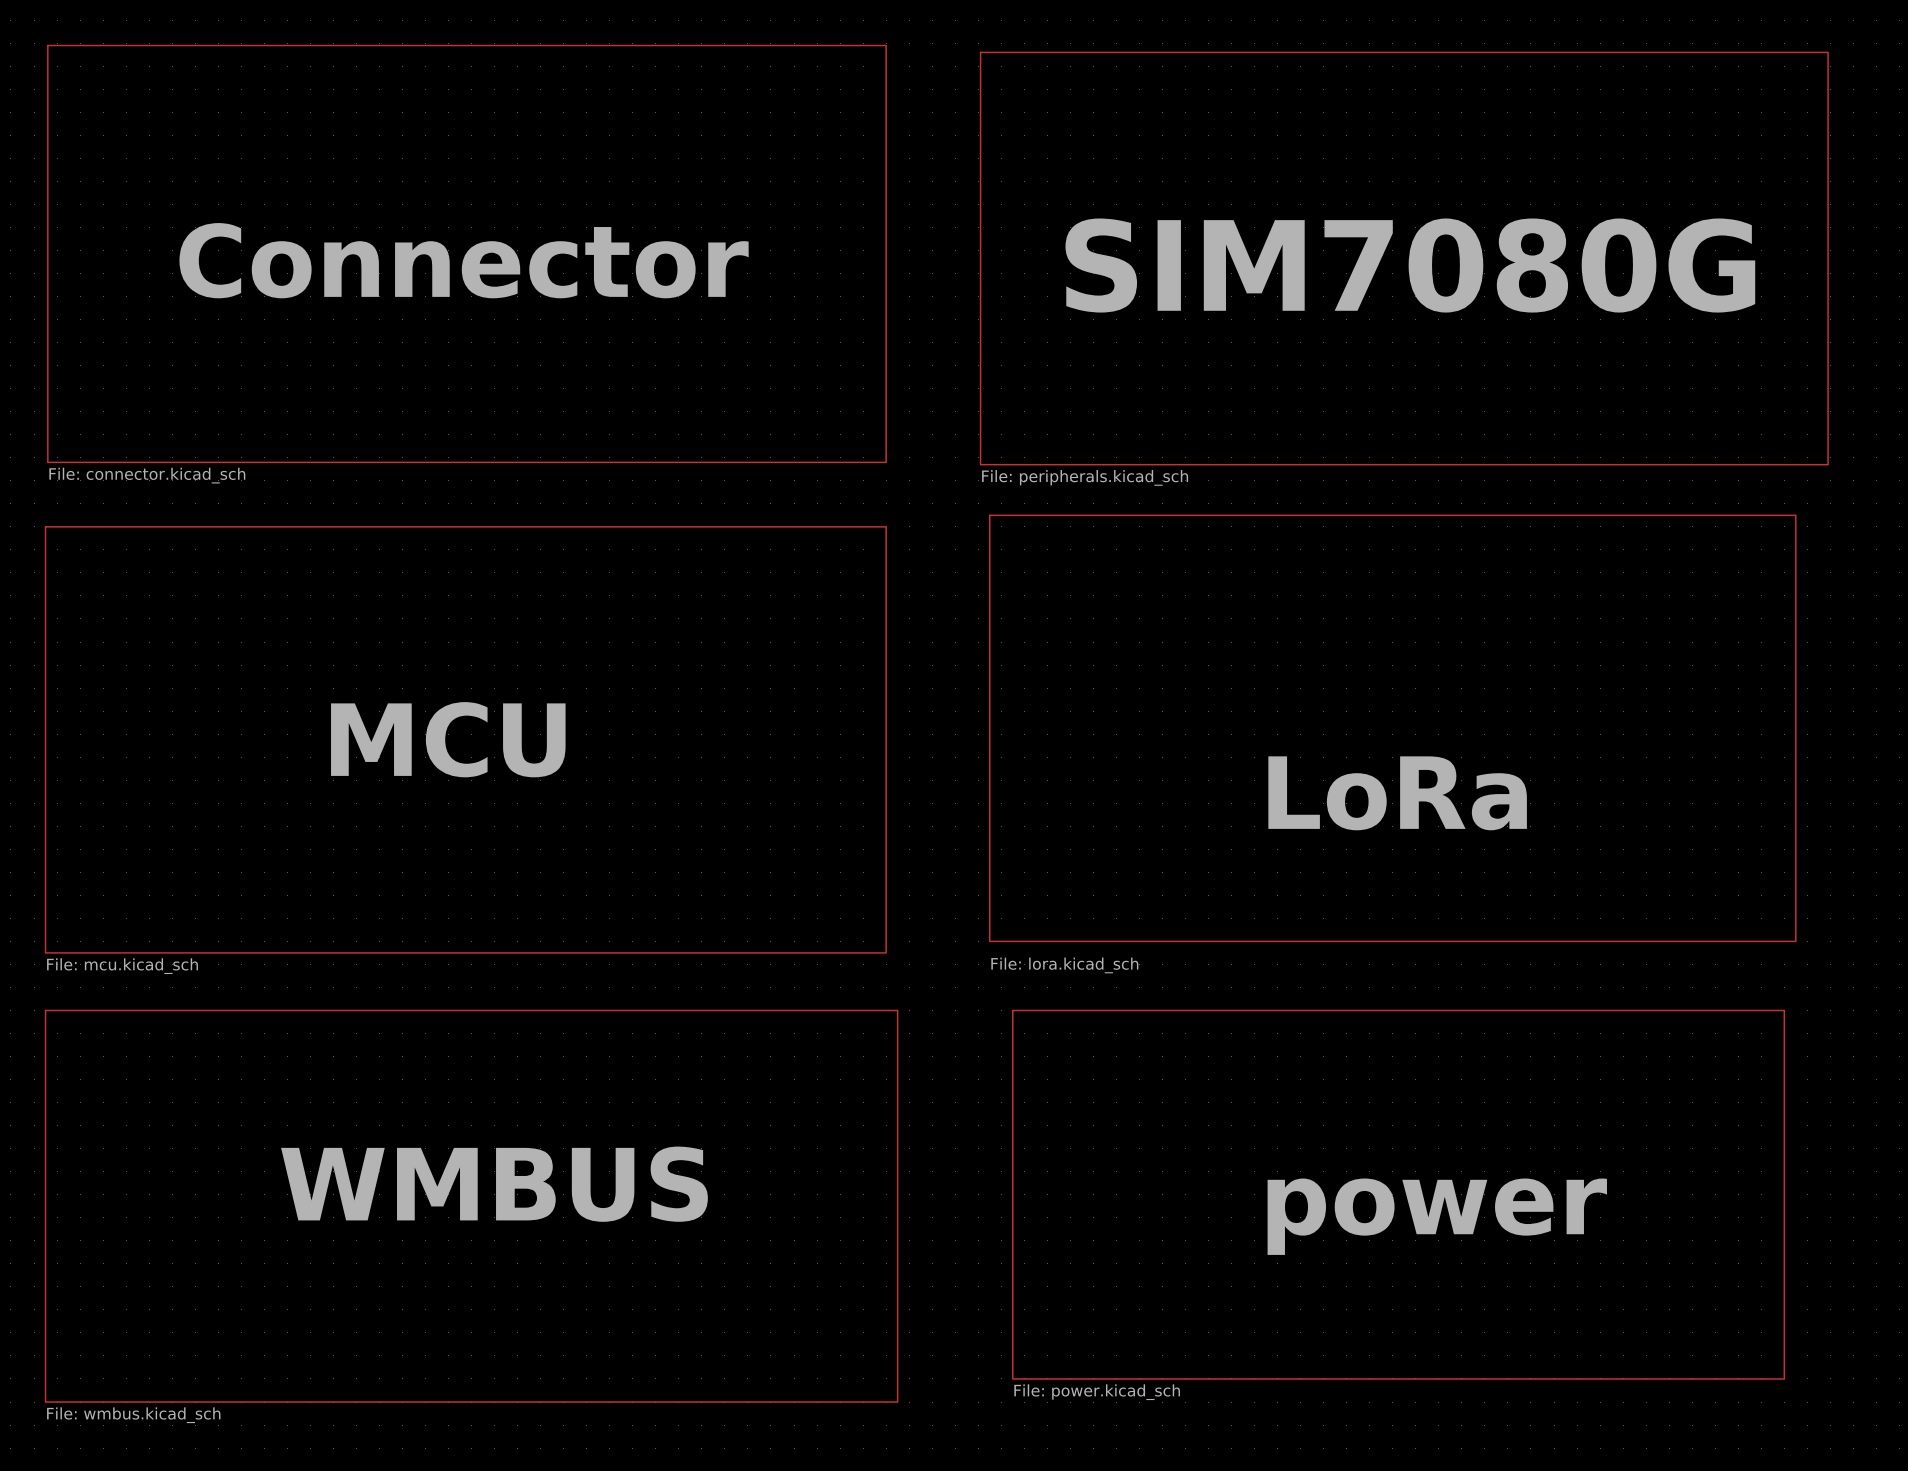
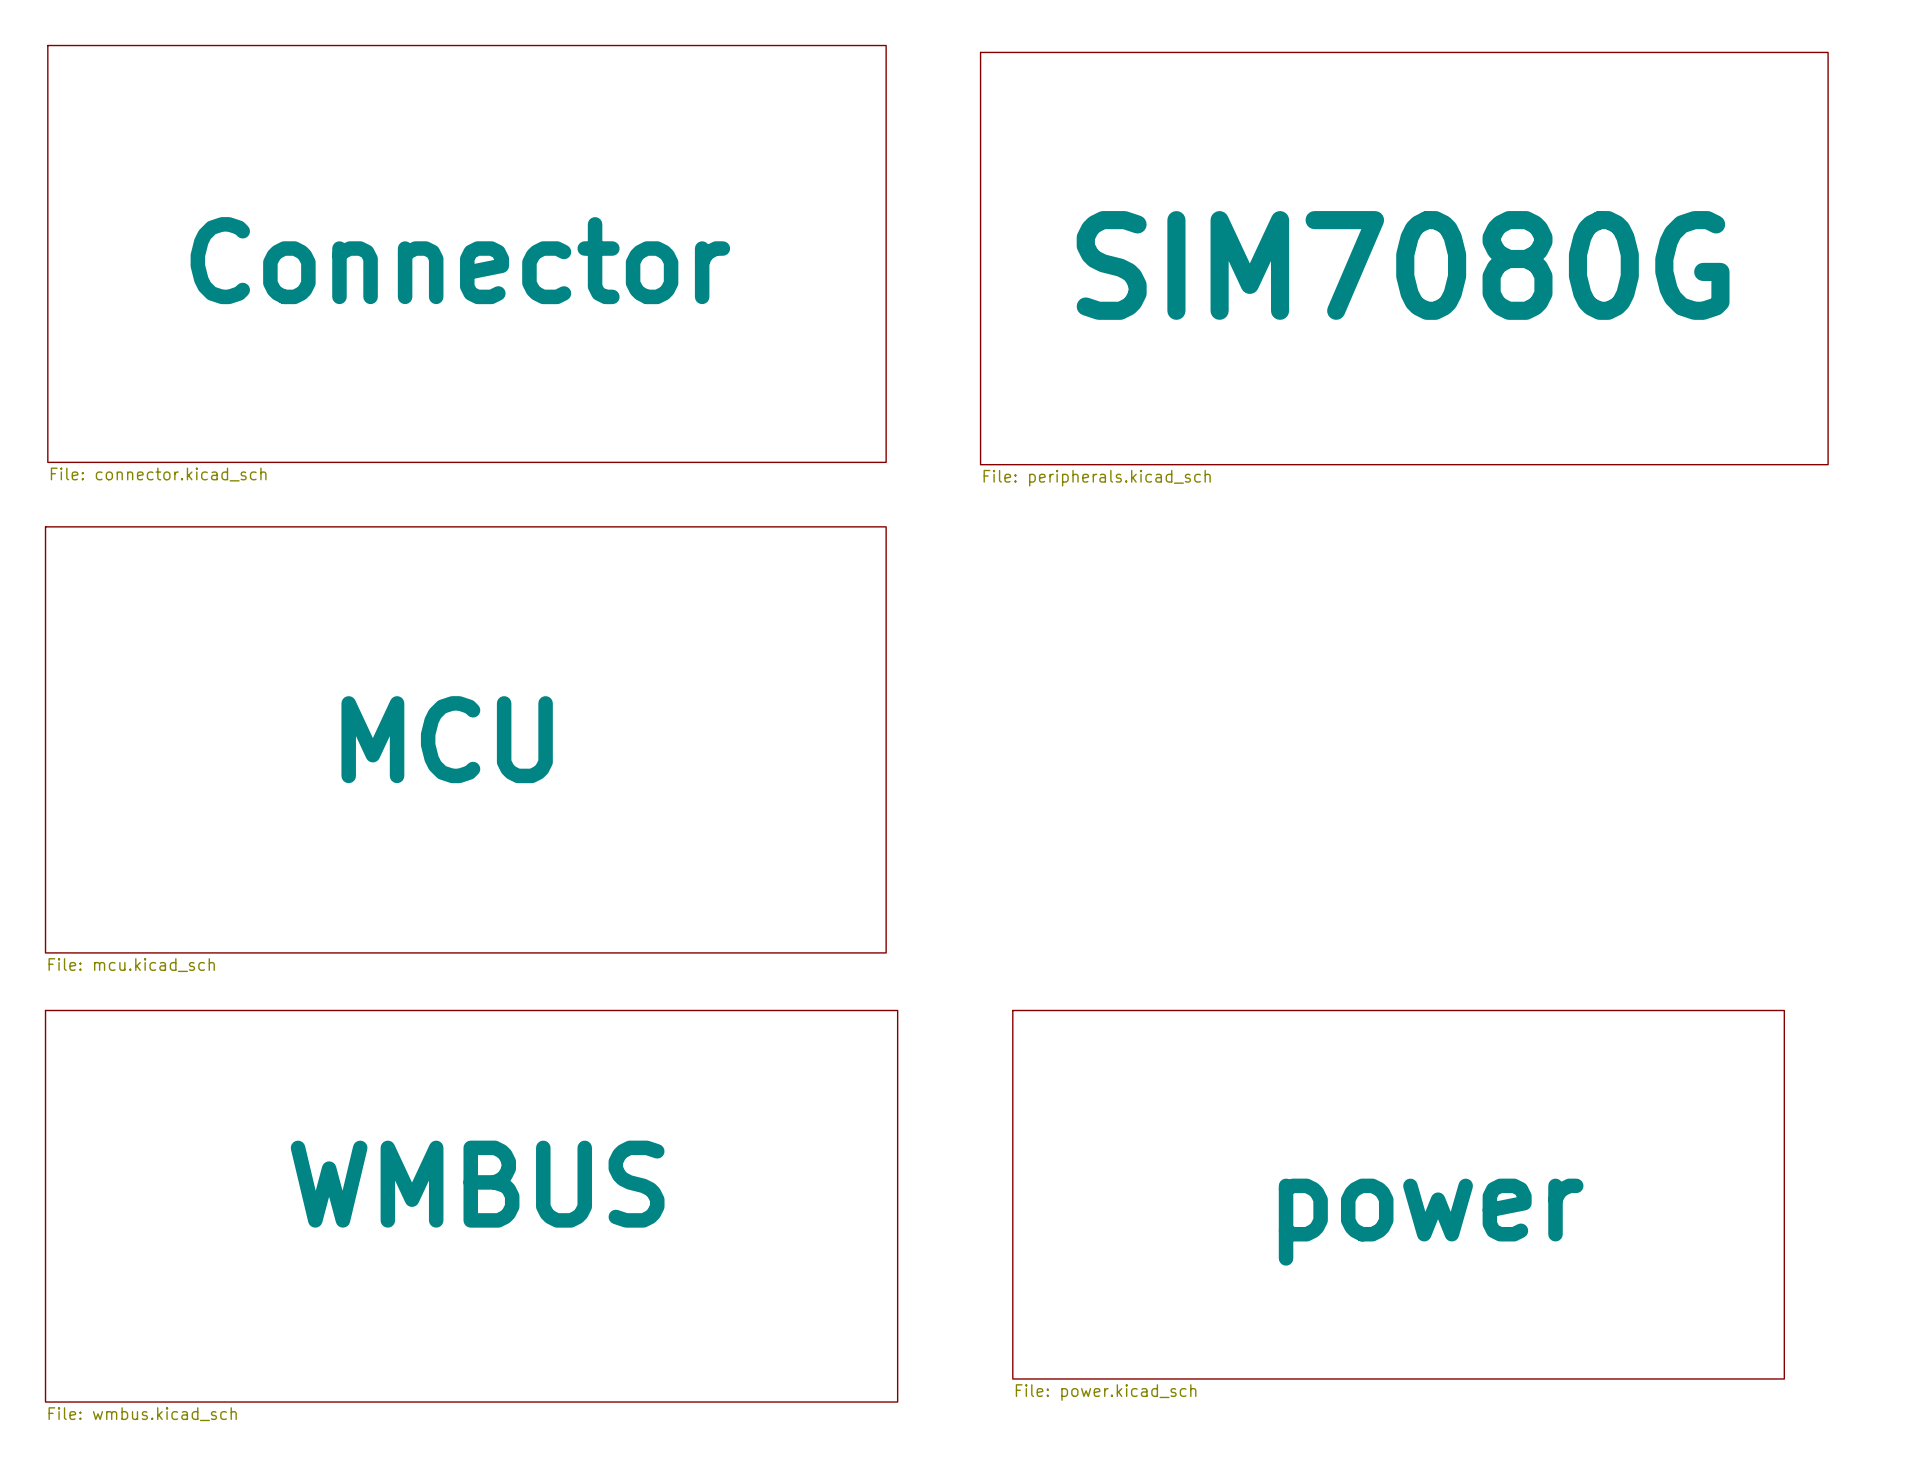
sheet LoRa: File: lora.kicad_sch (1392, 728) -> none

